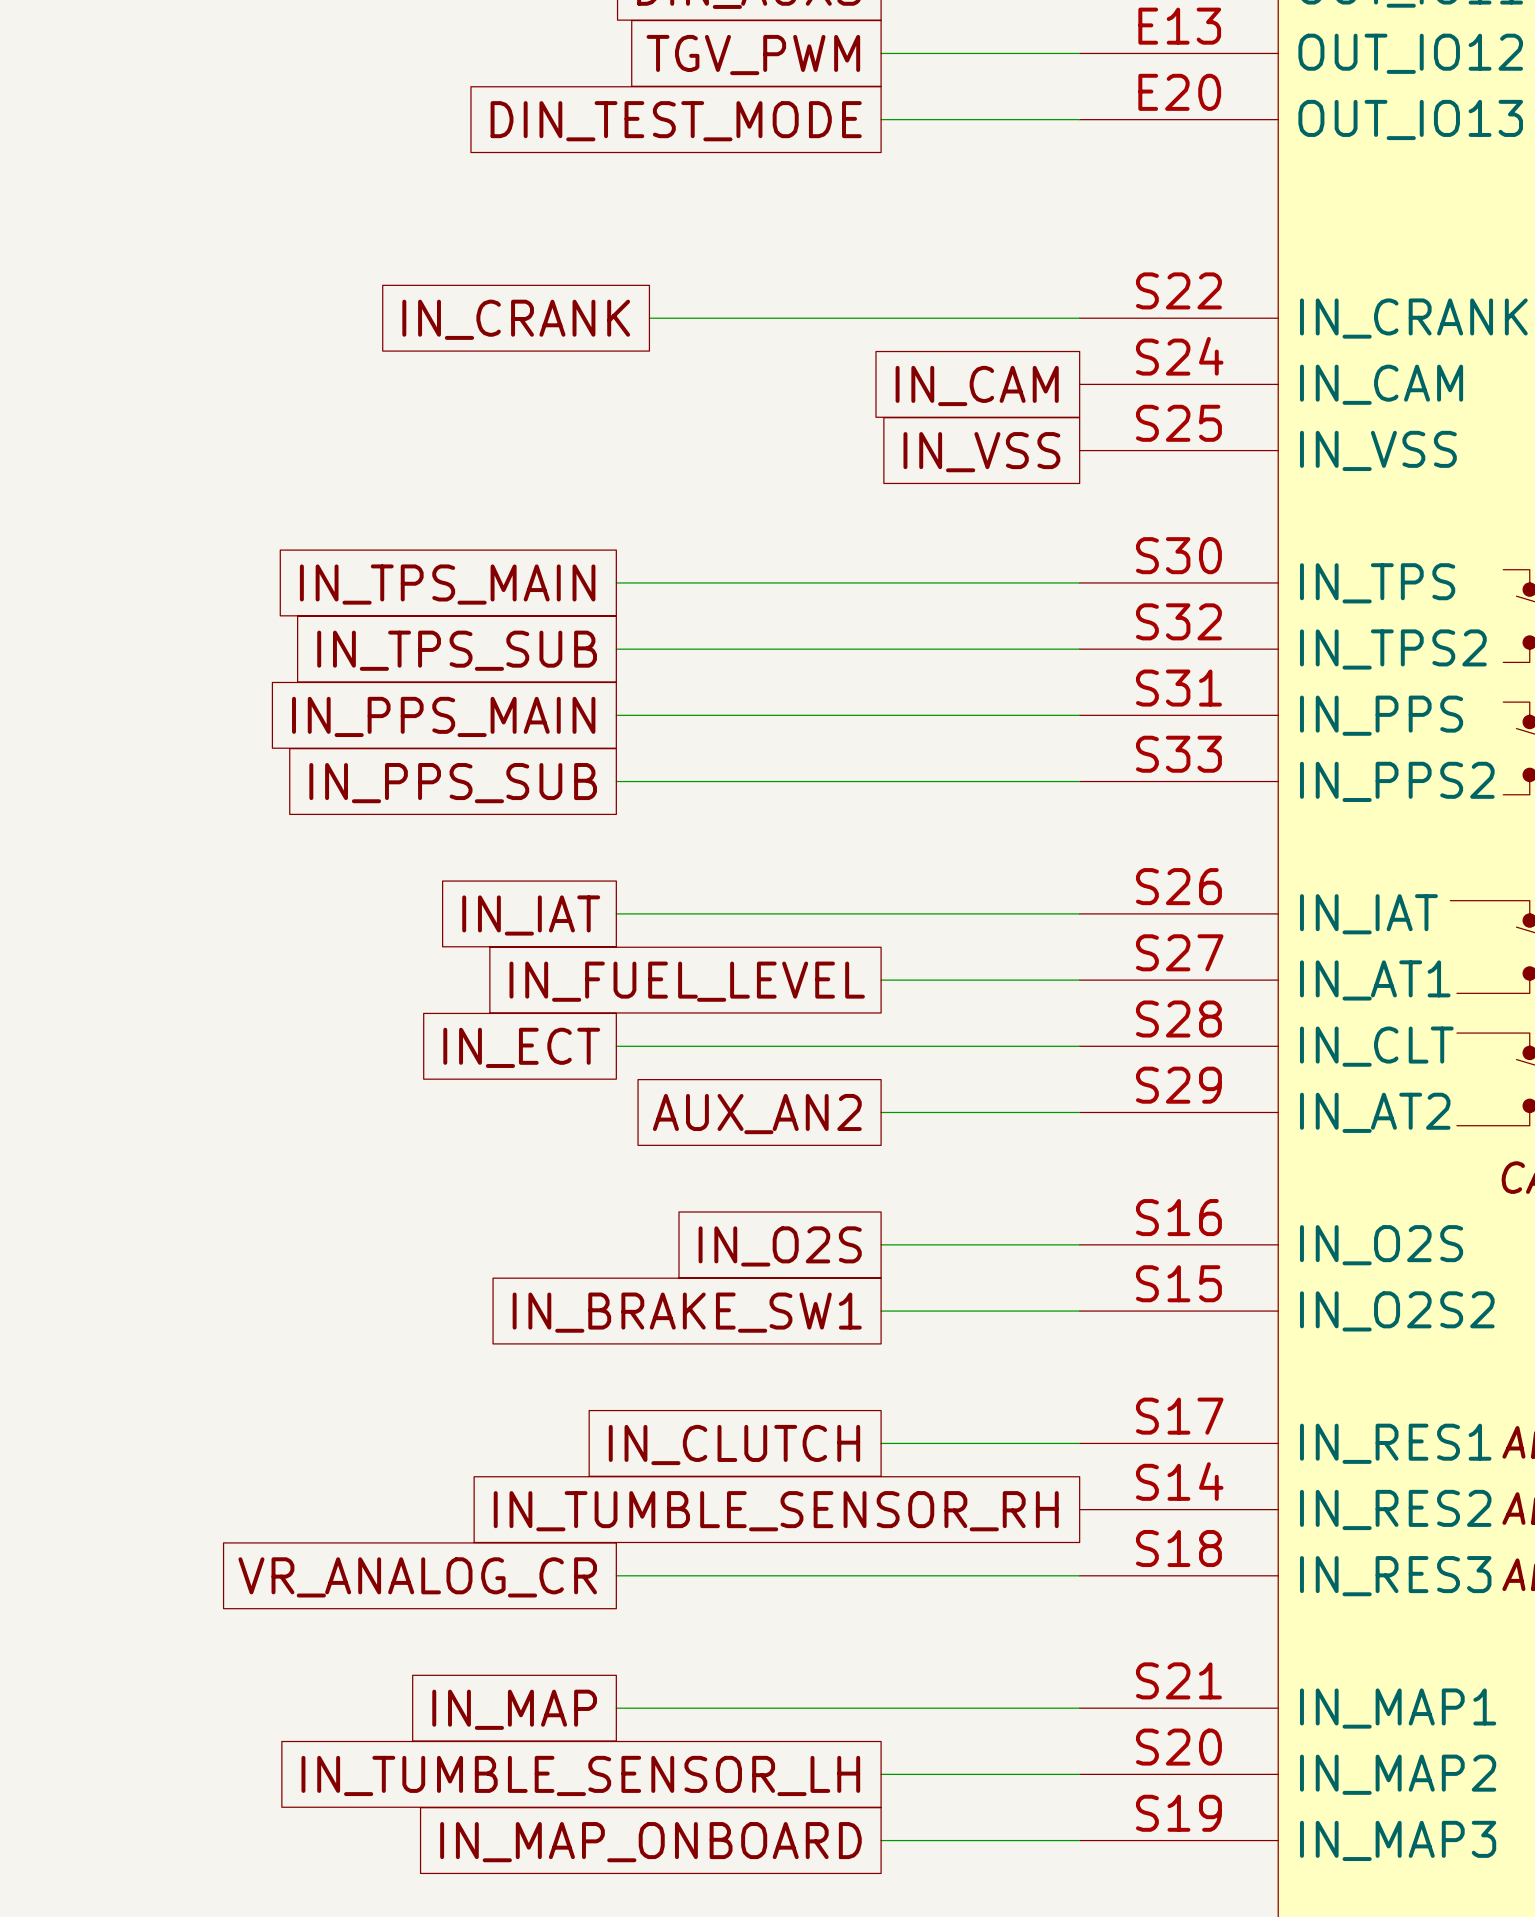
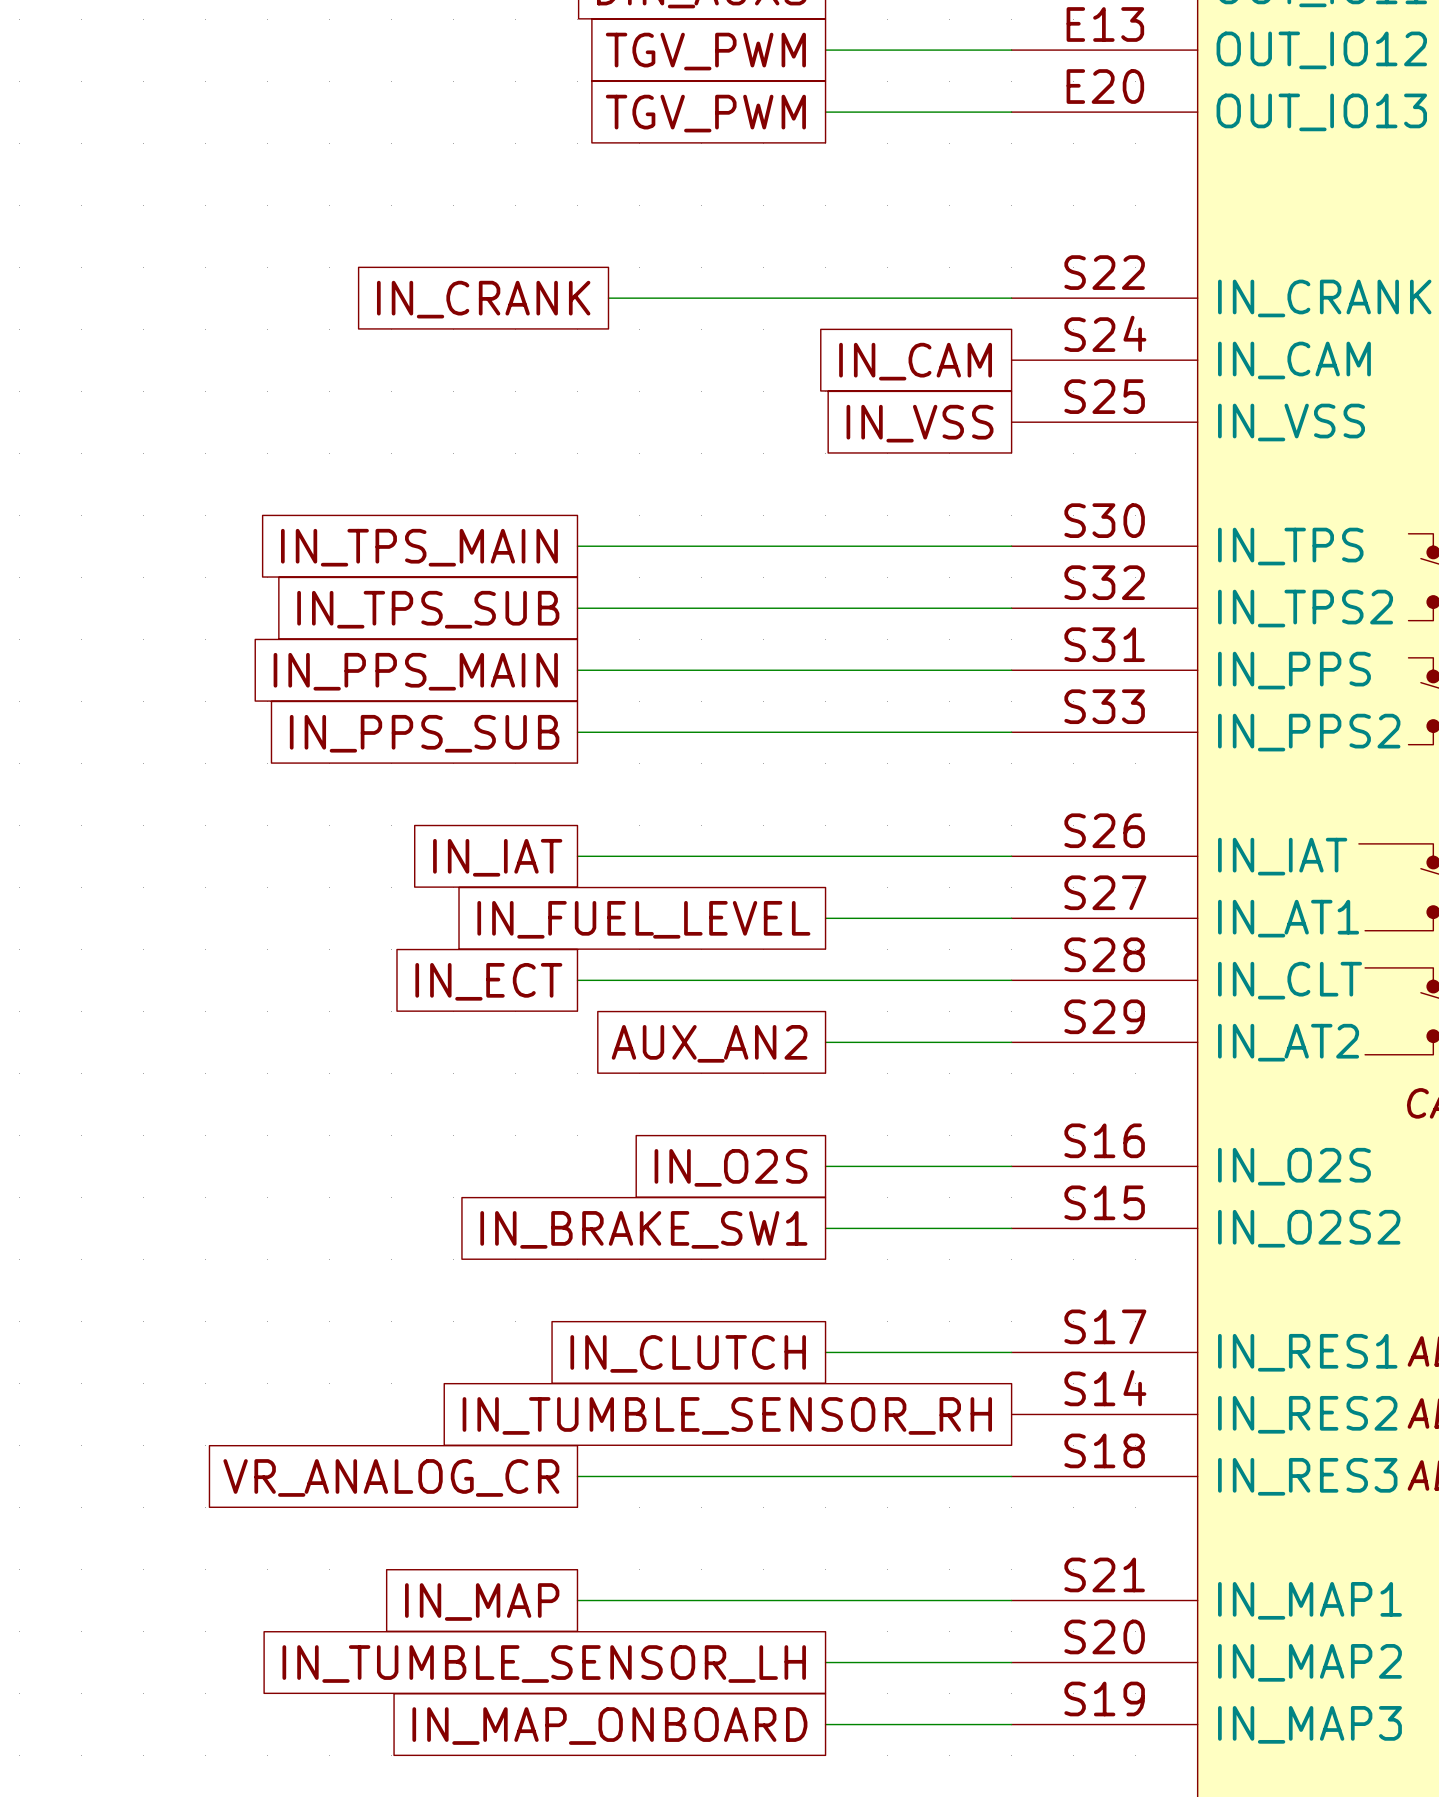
global label: DIN_TEST_MODE (676, 121) -> TGV_PWM (705, 113)

